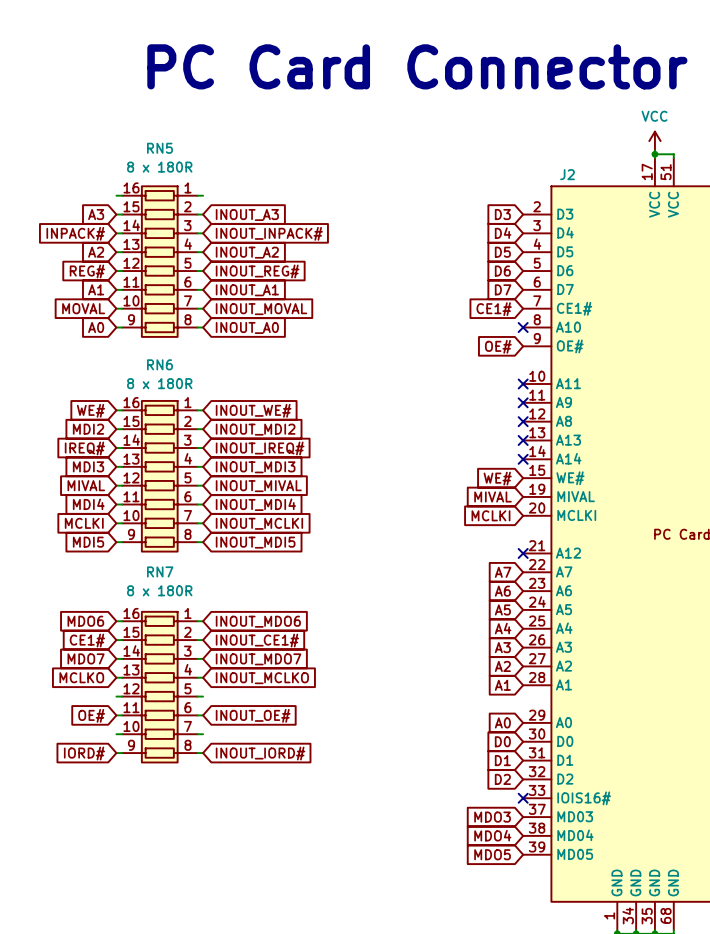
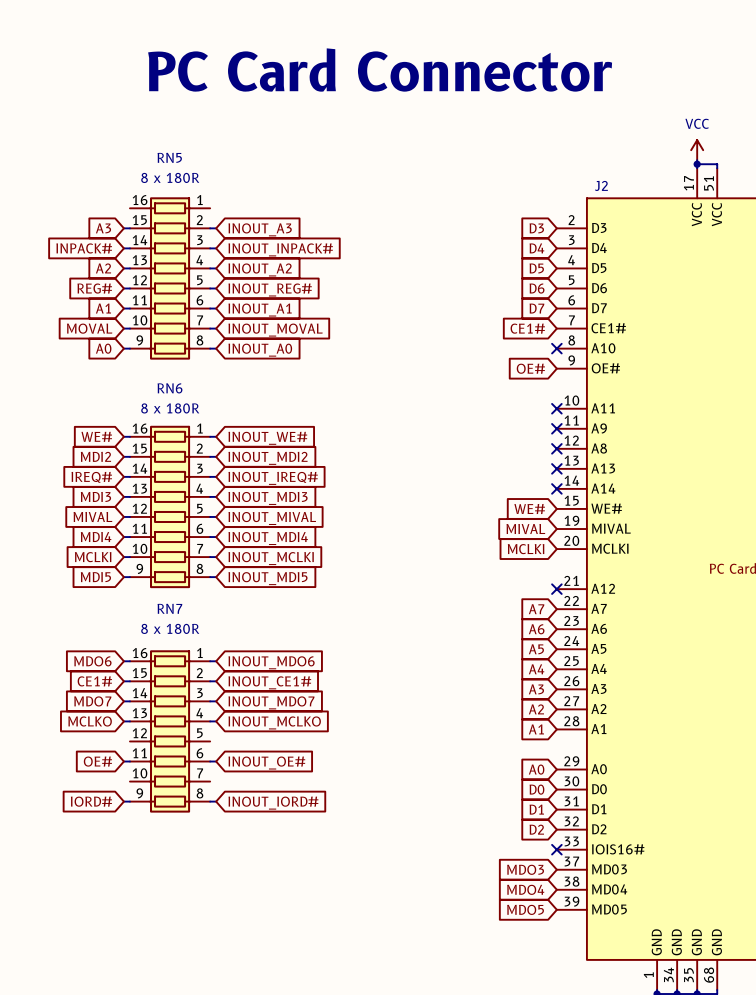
wire: (116, 195) (122, 195) -> none
wire: (197, 195) (203, 195) -> none
wire: (116, 696) (122, 696) -> none
wire: (197, 696) (203, 696) -> none
wire: (116, 734) (122, 734) -> none
wire: (197, 734) (203, 734) -> none

